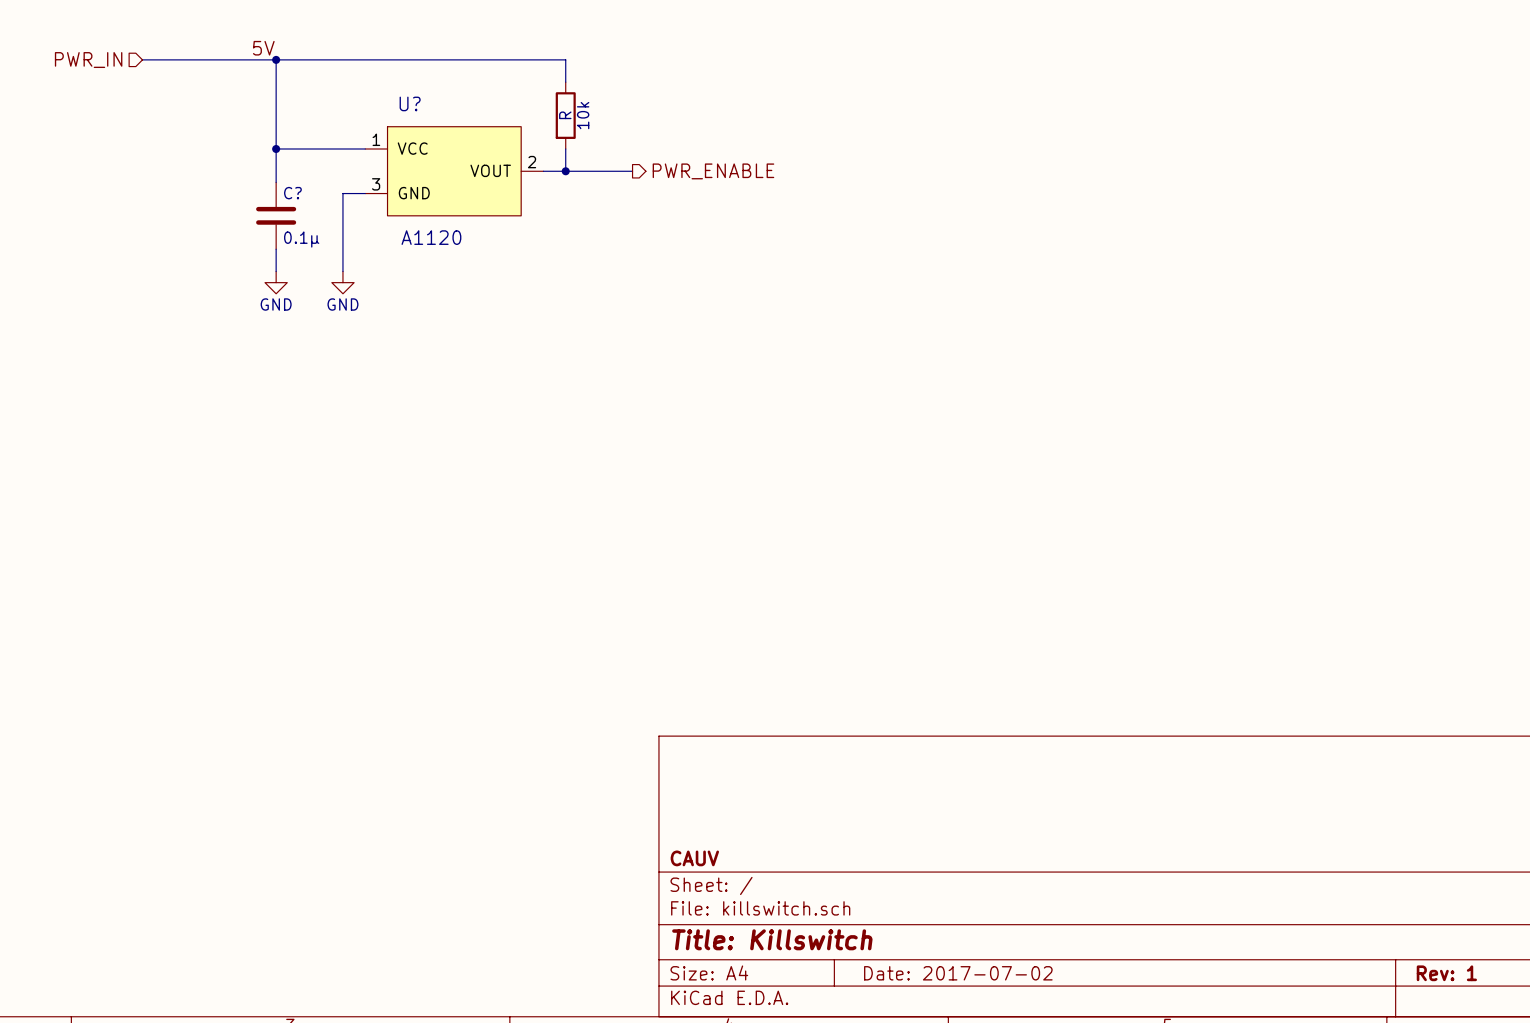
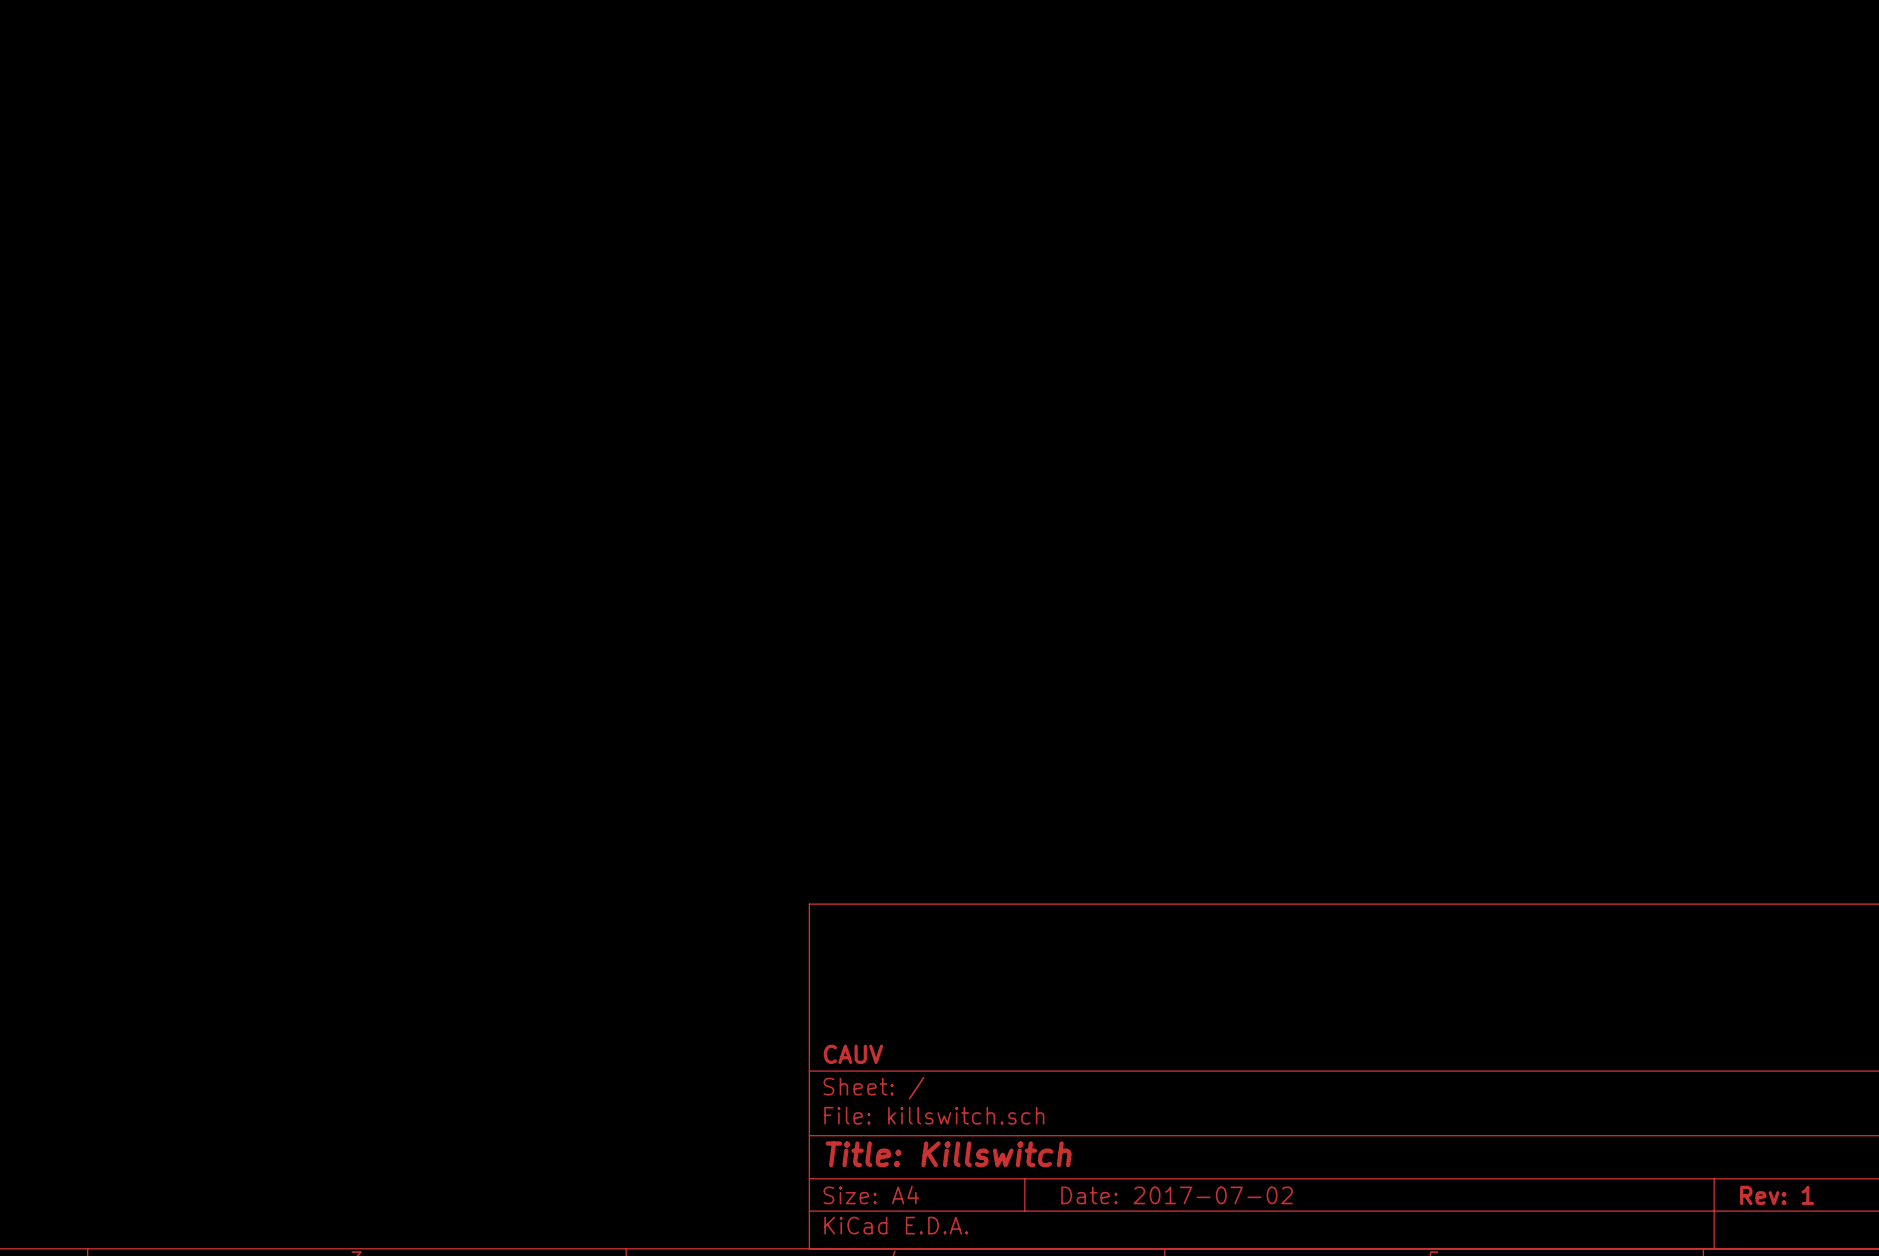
label: 5V (263, 48) -> none
wire: (142, 59) (565, 59) (565, 82) -> none
wire: (276, 59) (276, 182) -> none
junction: (276, 59) -> none
hierarchical label: PWR_IN (88, 60) -> none
10k: R (565, 115) -> none
wire: (276, 148) (365, 148) -> none
junction: (276, 148) -> none
wire: (565, 148) (565, 171) -> none
U?: A1120 (454, 171) -> none
wire: (543, 171) (632, 171) -> none
junction: (565, 171) -> none
hierarchical label: PWR_ENABLE (713, 171) -> none
wire: (365, 193) (342, 193) (342, 271) -> none
C?: 0.1μ (276, 215) -> none
wire: (276, 249) (276, 271) -> none
power symbol: GND (276, 282) -> none
power symbol: GND (342, 282) -> none

